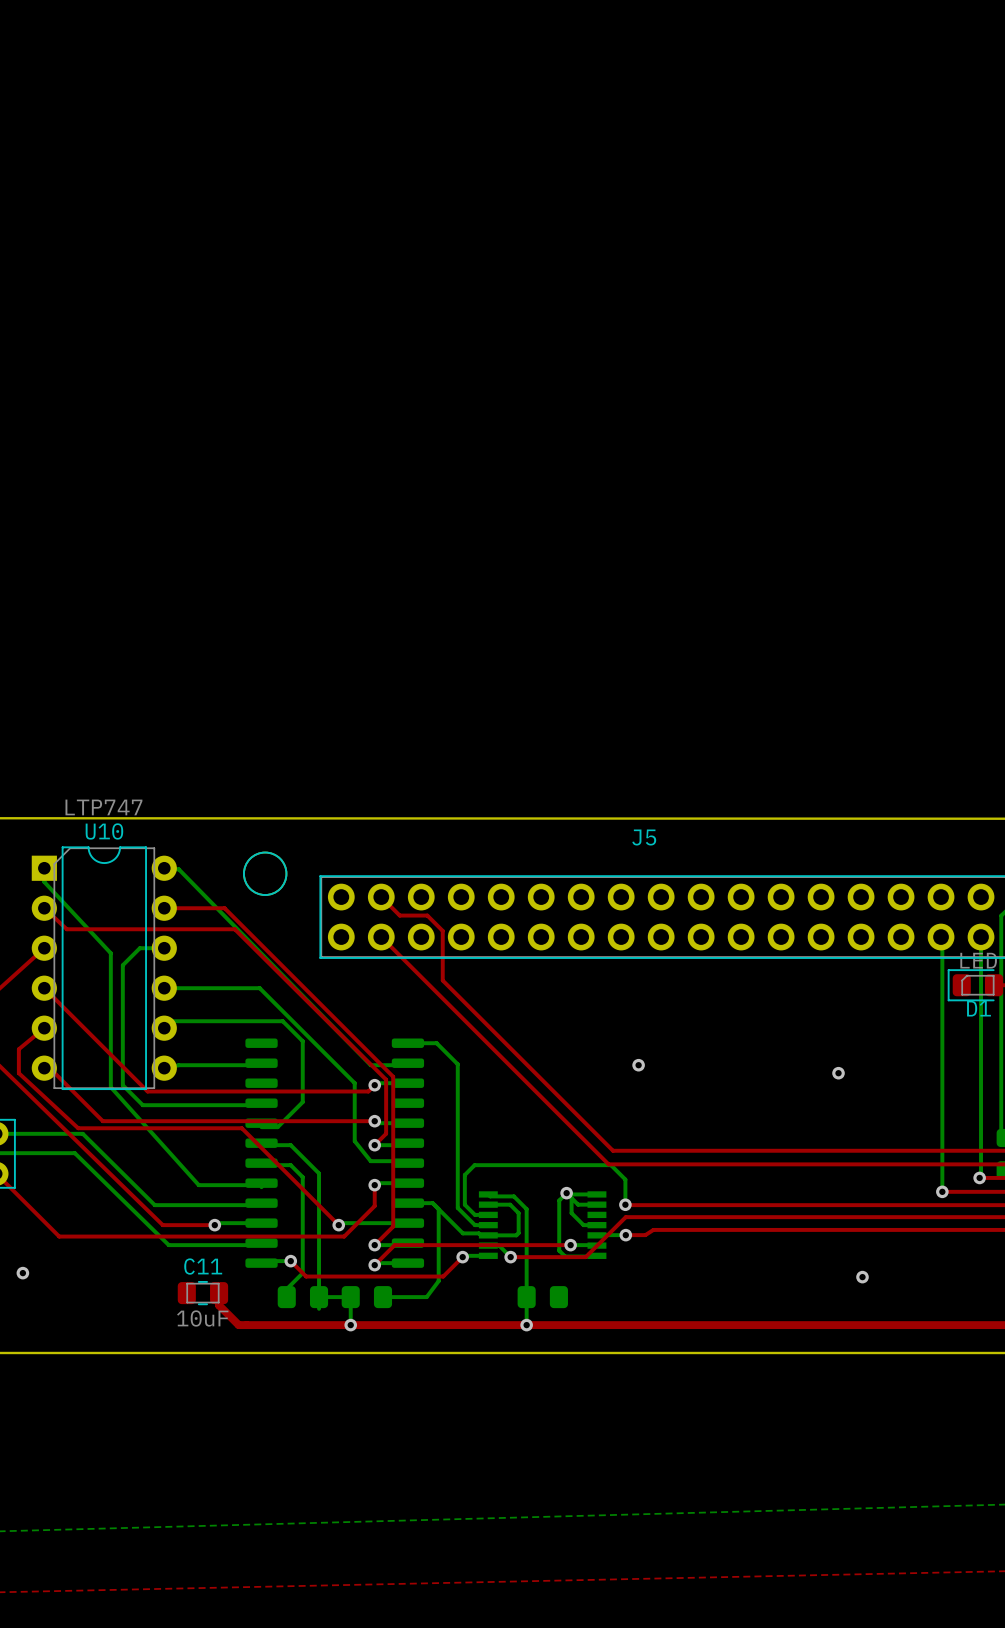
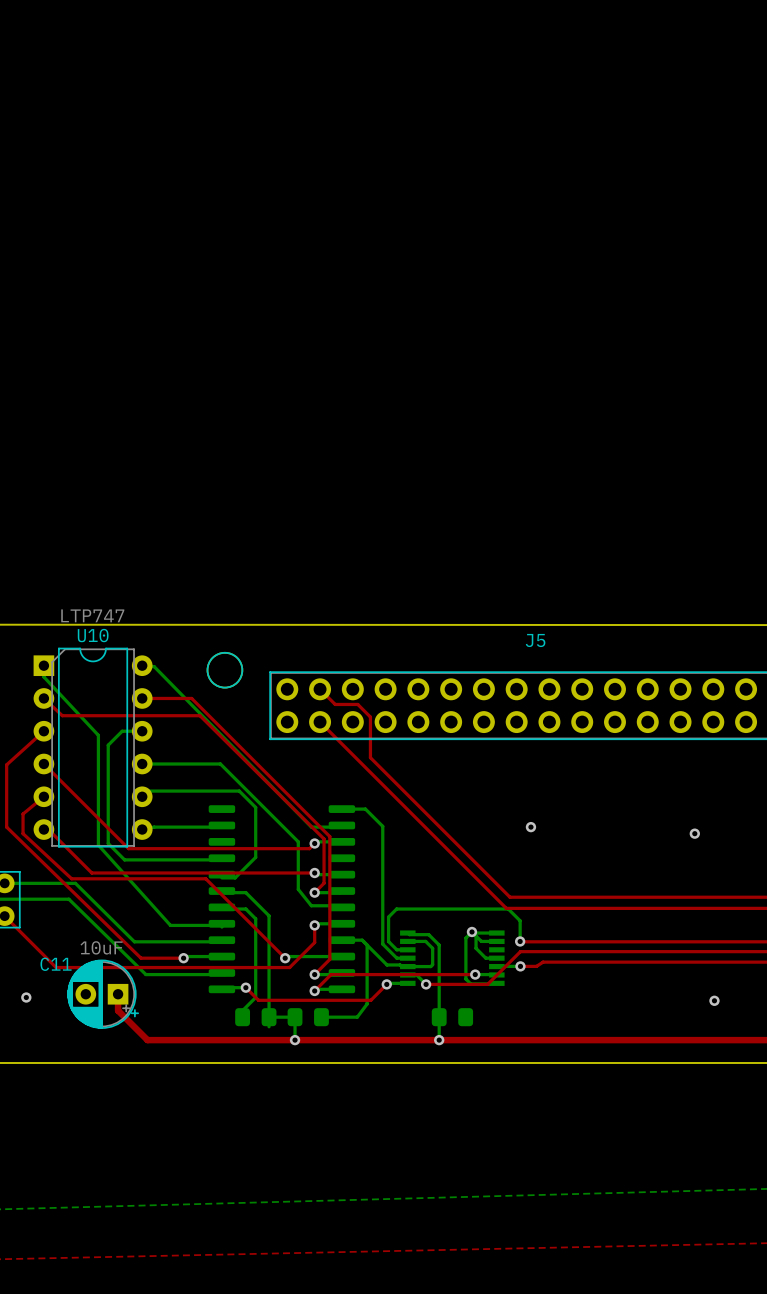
C11 name position: C11 (203, 1266) -> C11 (56, 964)
C11 footprint: [177, 1280, 229, 1306] -> [67, 959, 139, 1029]
top track: (219, 1293) (219, 1305) (238, 1325) -> (118, 994) (118, 1010) (147, 1040) (203, 1040)
C11 value position: 10uF (202, 1318) -> 10uF (101, 947)

